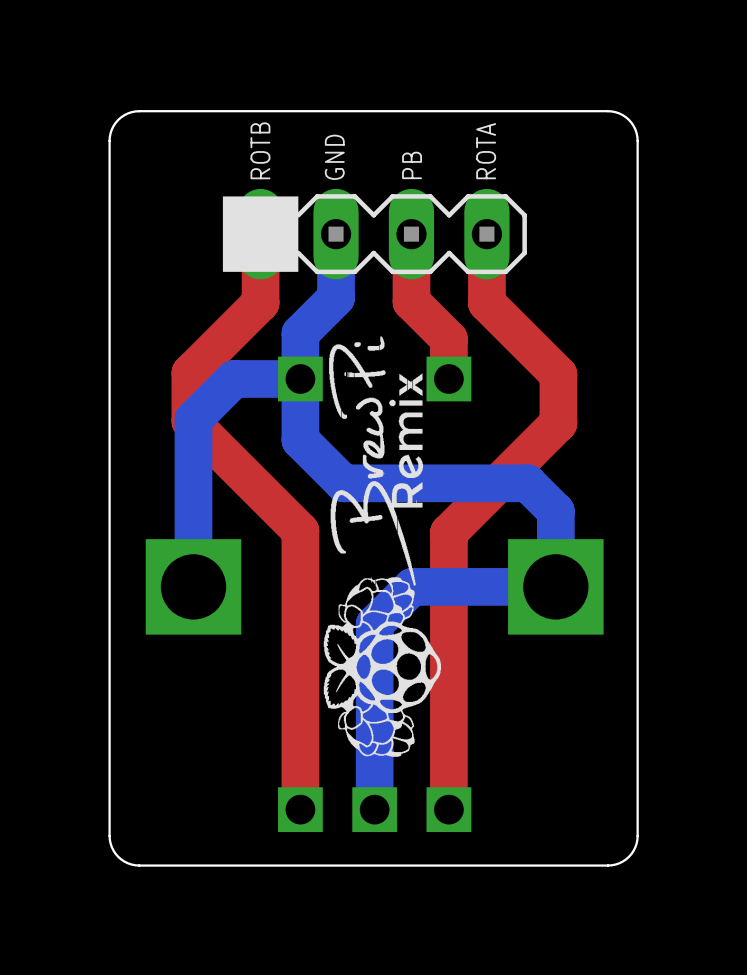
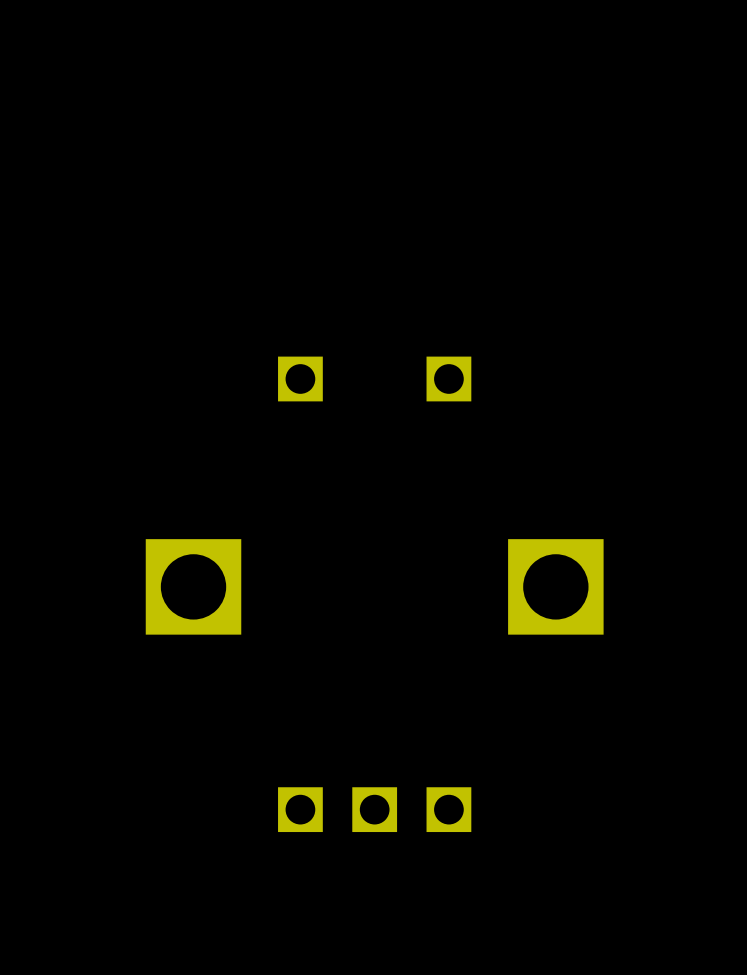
board edge: (607, 111) (139, 111) (124, 115) (113, 126) (109, 140) (109, 835) (113, 850) (124, 861) (139, 865) (607, 865) (622, 861) (633, 850) (637, 835) (637, 140) (635, 129) (628, 119) (619, 113) (607, 111) -> none
text: ROTB (260, 150) -> none
text: ROTA (486, 151) -> none
text: GND (334, 157) -> none
text: PB (412, 165) -> none
top track: (260, 234) (260, 302) (190, 373) (190, 421) (300, 531) (300, 809) -> none
bottom track: (336, 234) (336, 297) (300, 333) (300, 440) (343, 483) (527, 483) (555, 511) (555, 586) (412, 586) (374, 624) (374, 809) -> none
part: (374, 234) -> none
top track: (411, 234) (411, 301) (448, 339) (448, 378) -> none
top track: (486, 234) (486, 303) (558, 374) (558, 423) (448, 532) (448, 809) -> none
drawing: [323, 336, 442, 757] -> none
bottom track: (300, 378) (234, 378) (193, 419) (193, 586) -> none

